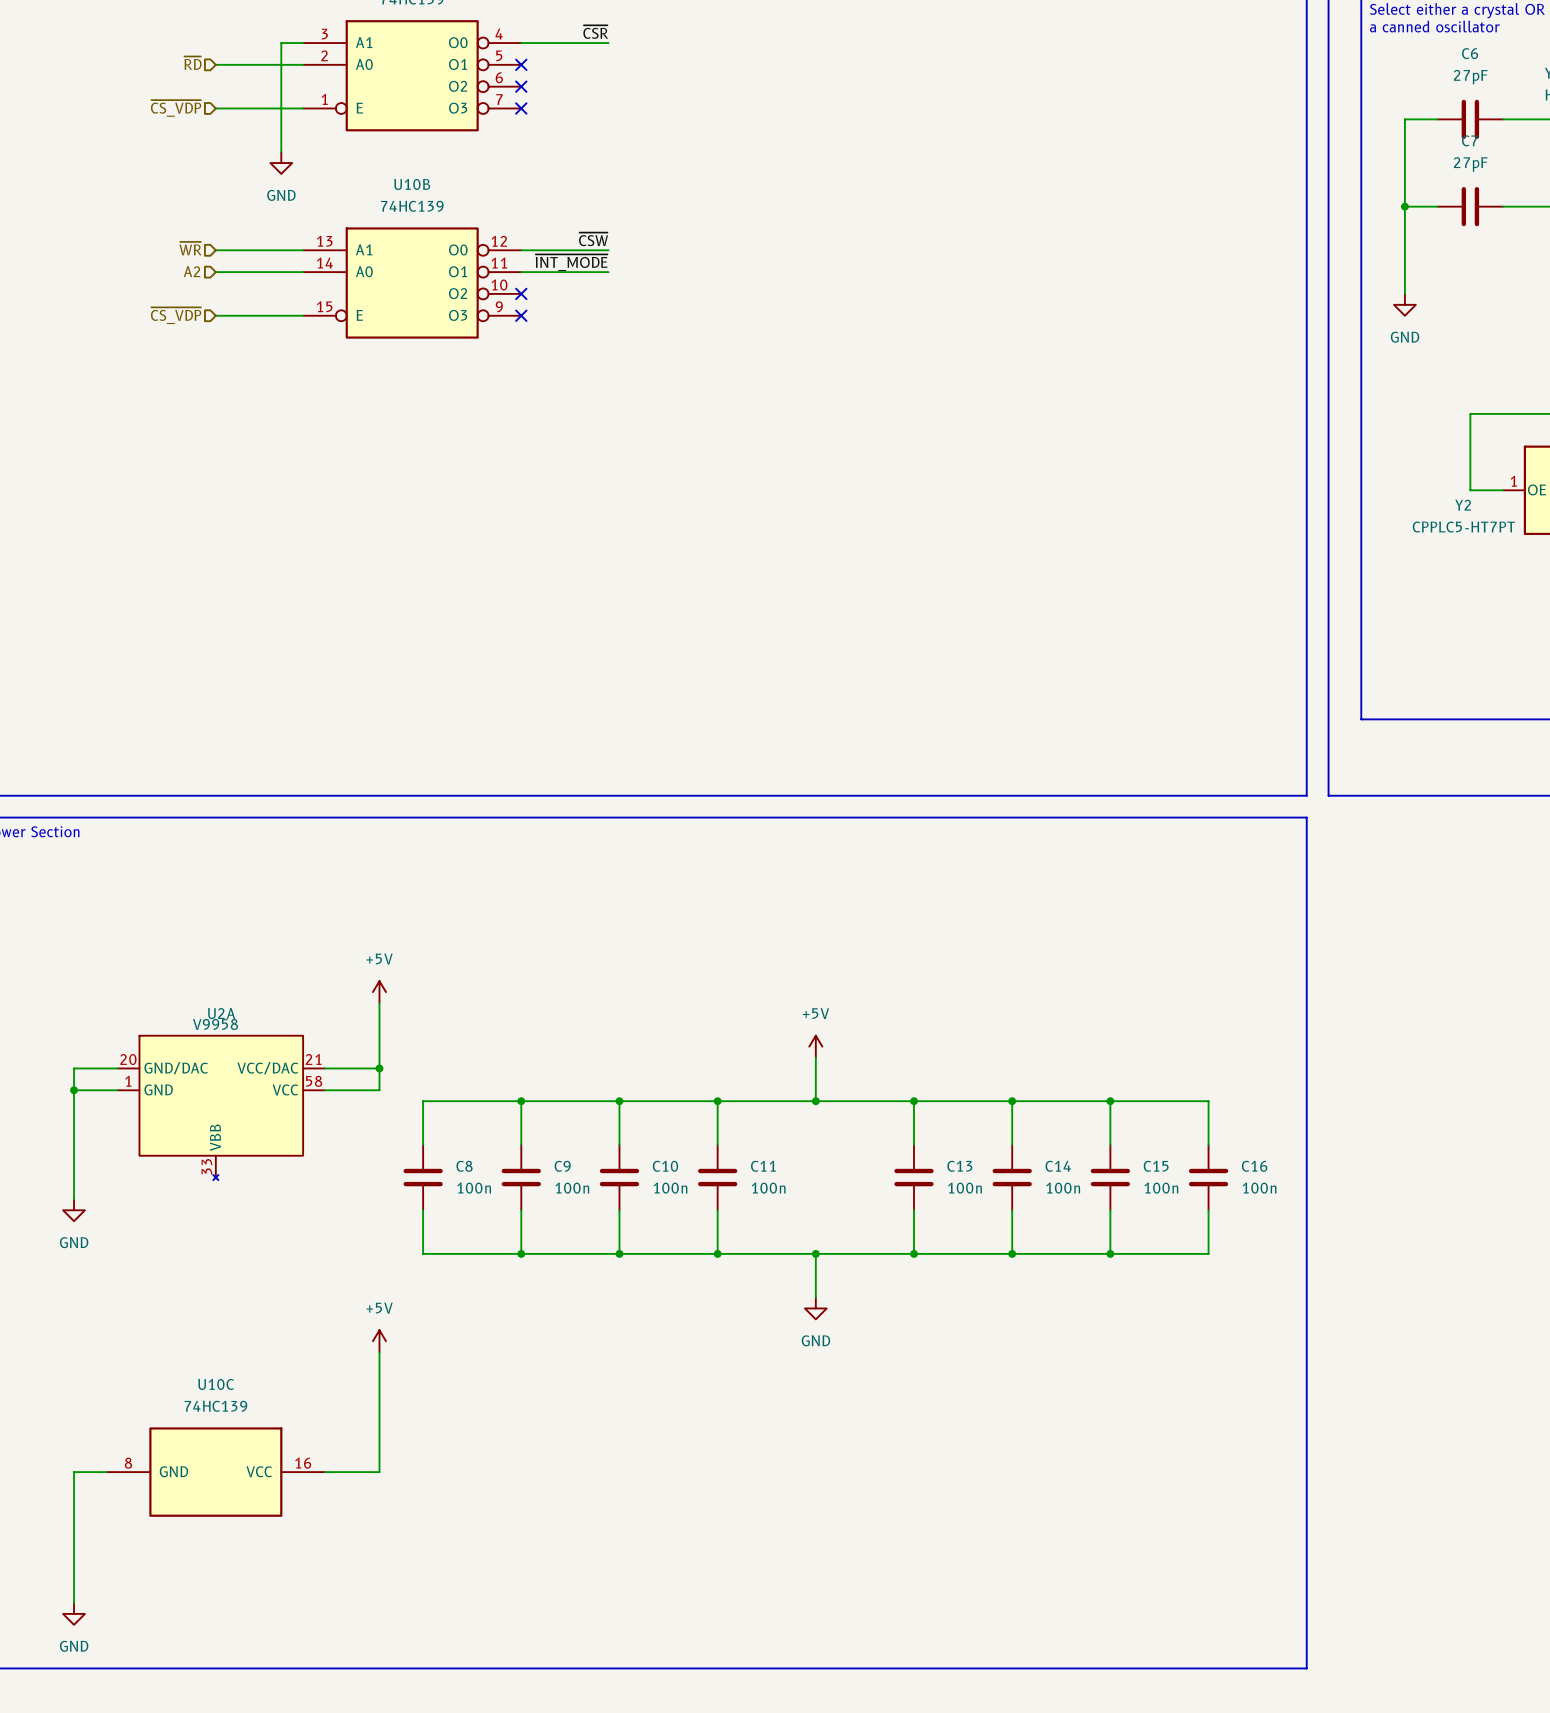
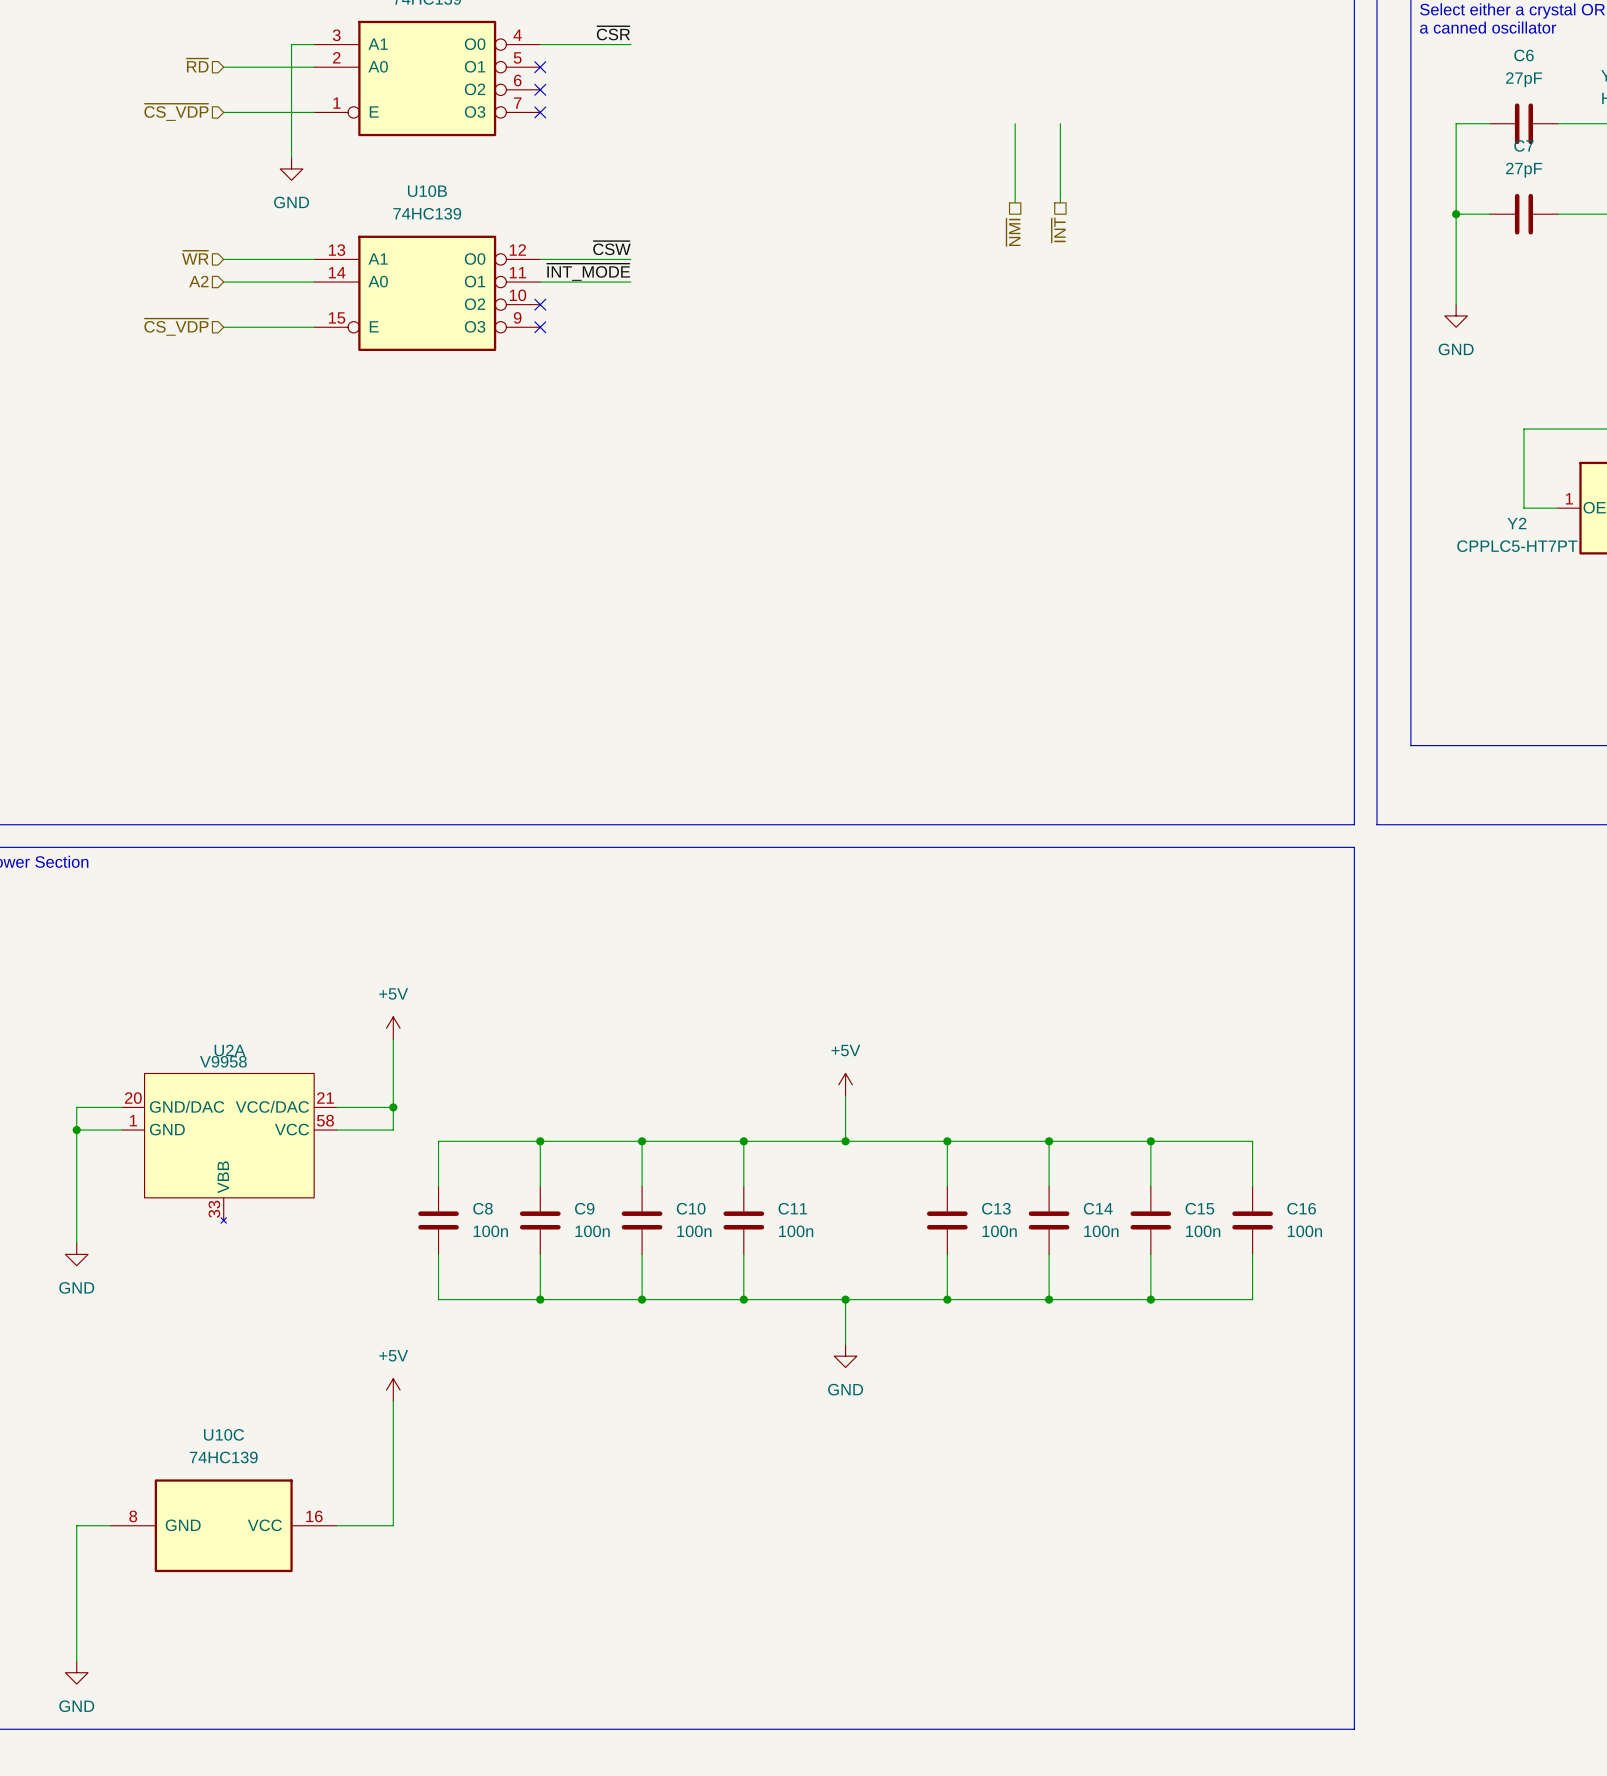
wire: none -> (1015, 123) (1015, 202)
wire: none -> (1060, 123) (1060, 202)
hierarchical label: none -> ~{INT} (1058, 230)
hierarchical label: none -> ~{NMI} (1013, 232)

